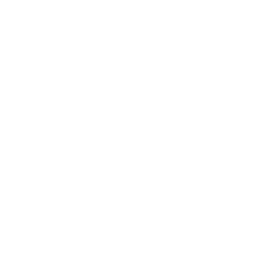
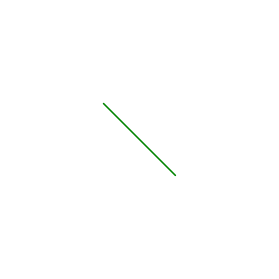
wire: none -> (103, 103) (175, 175)

